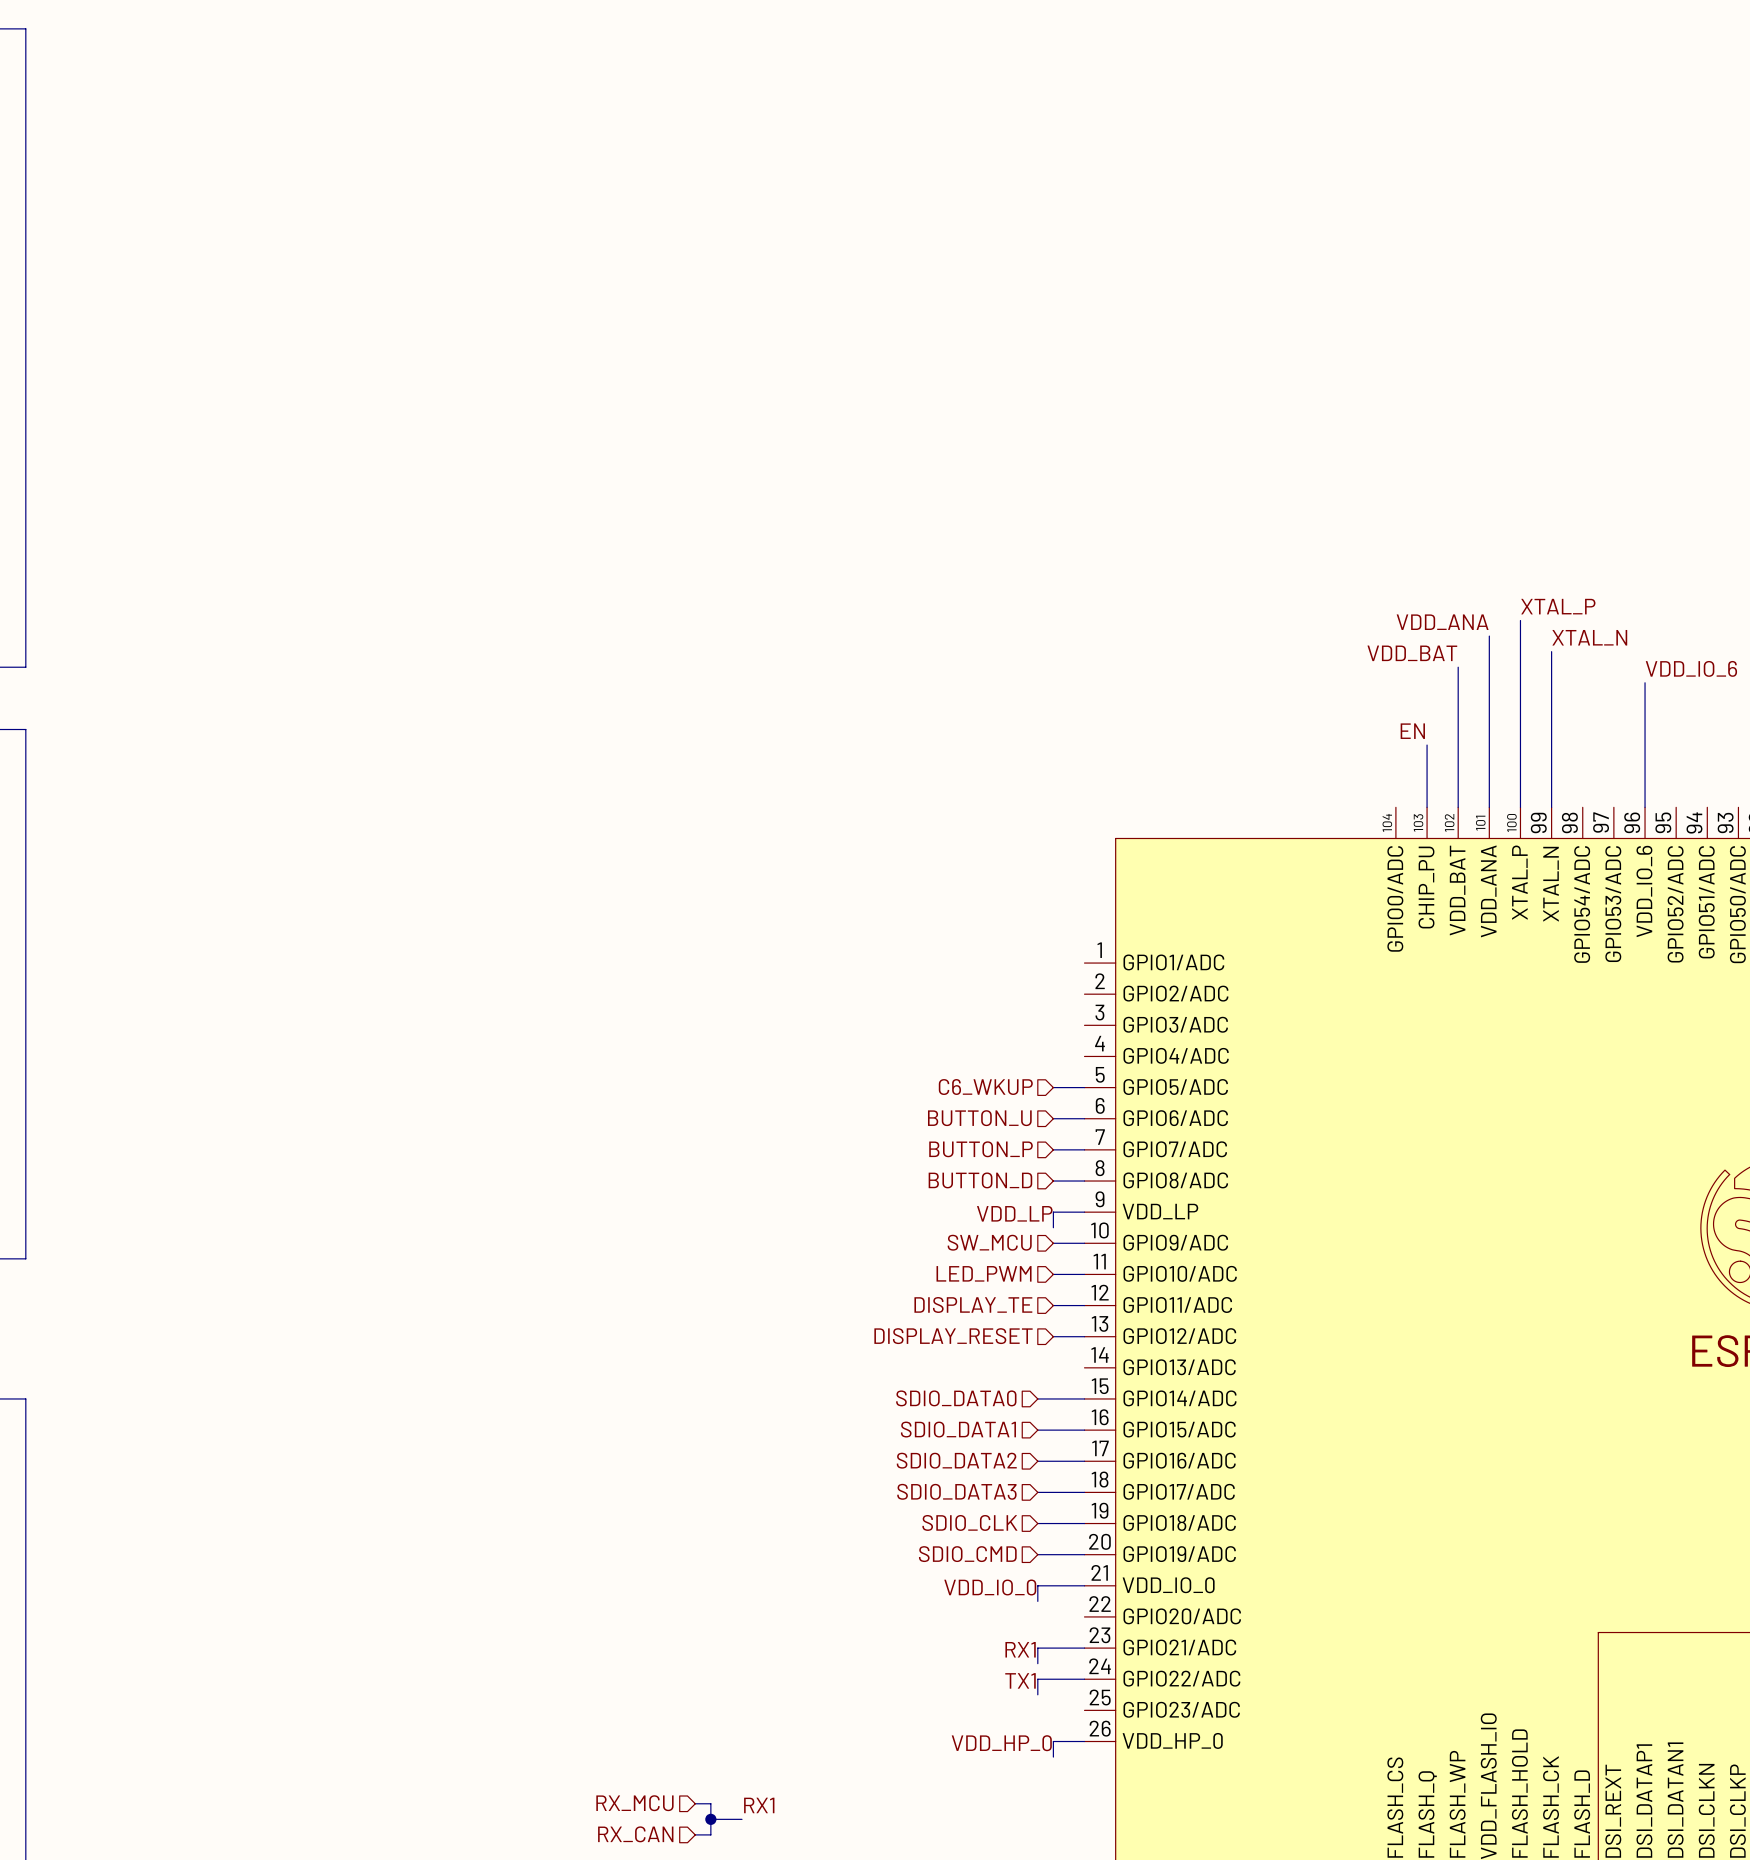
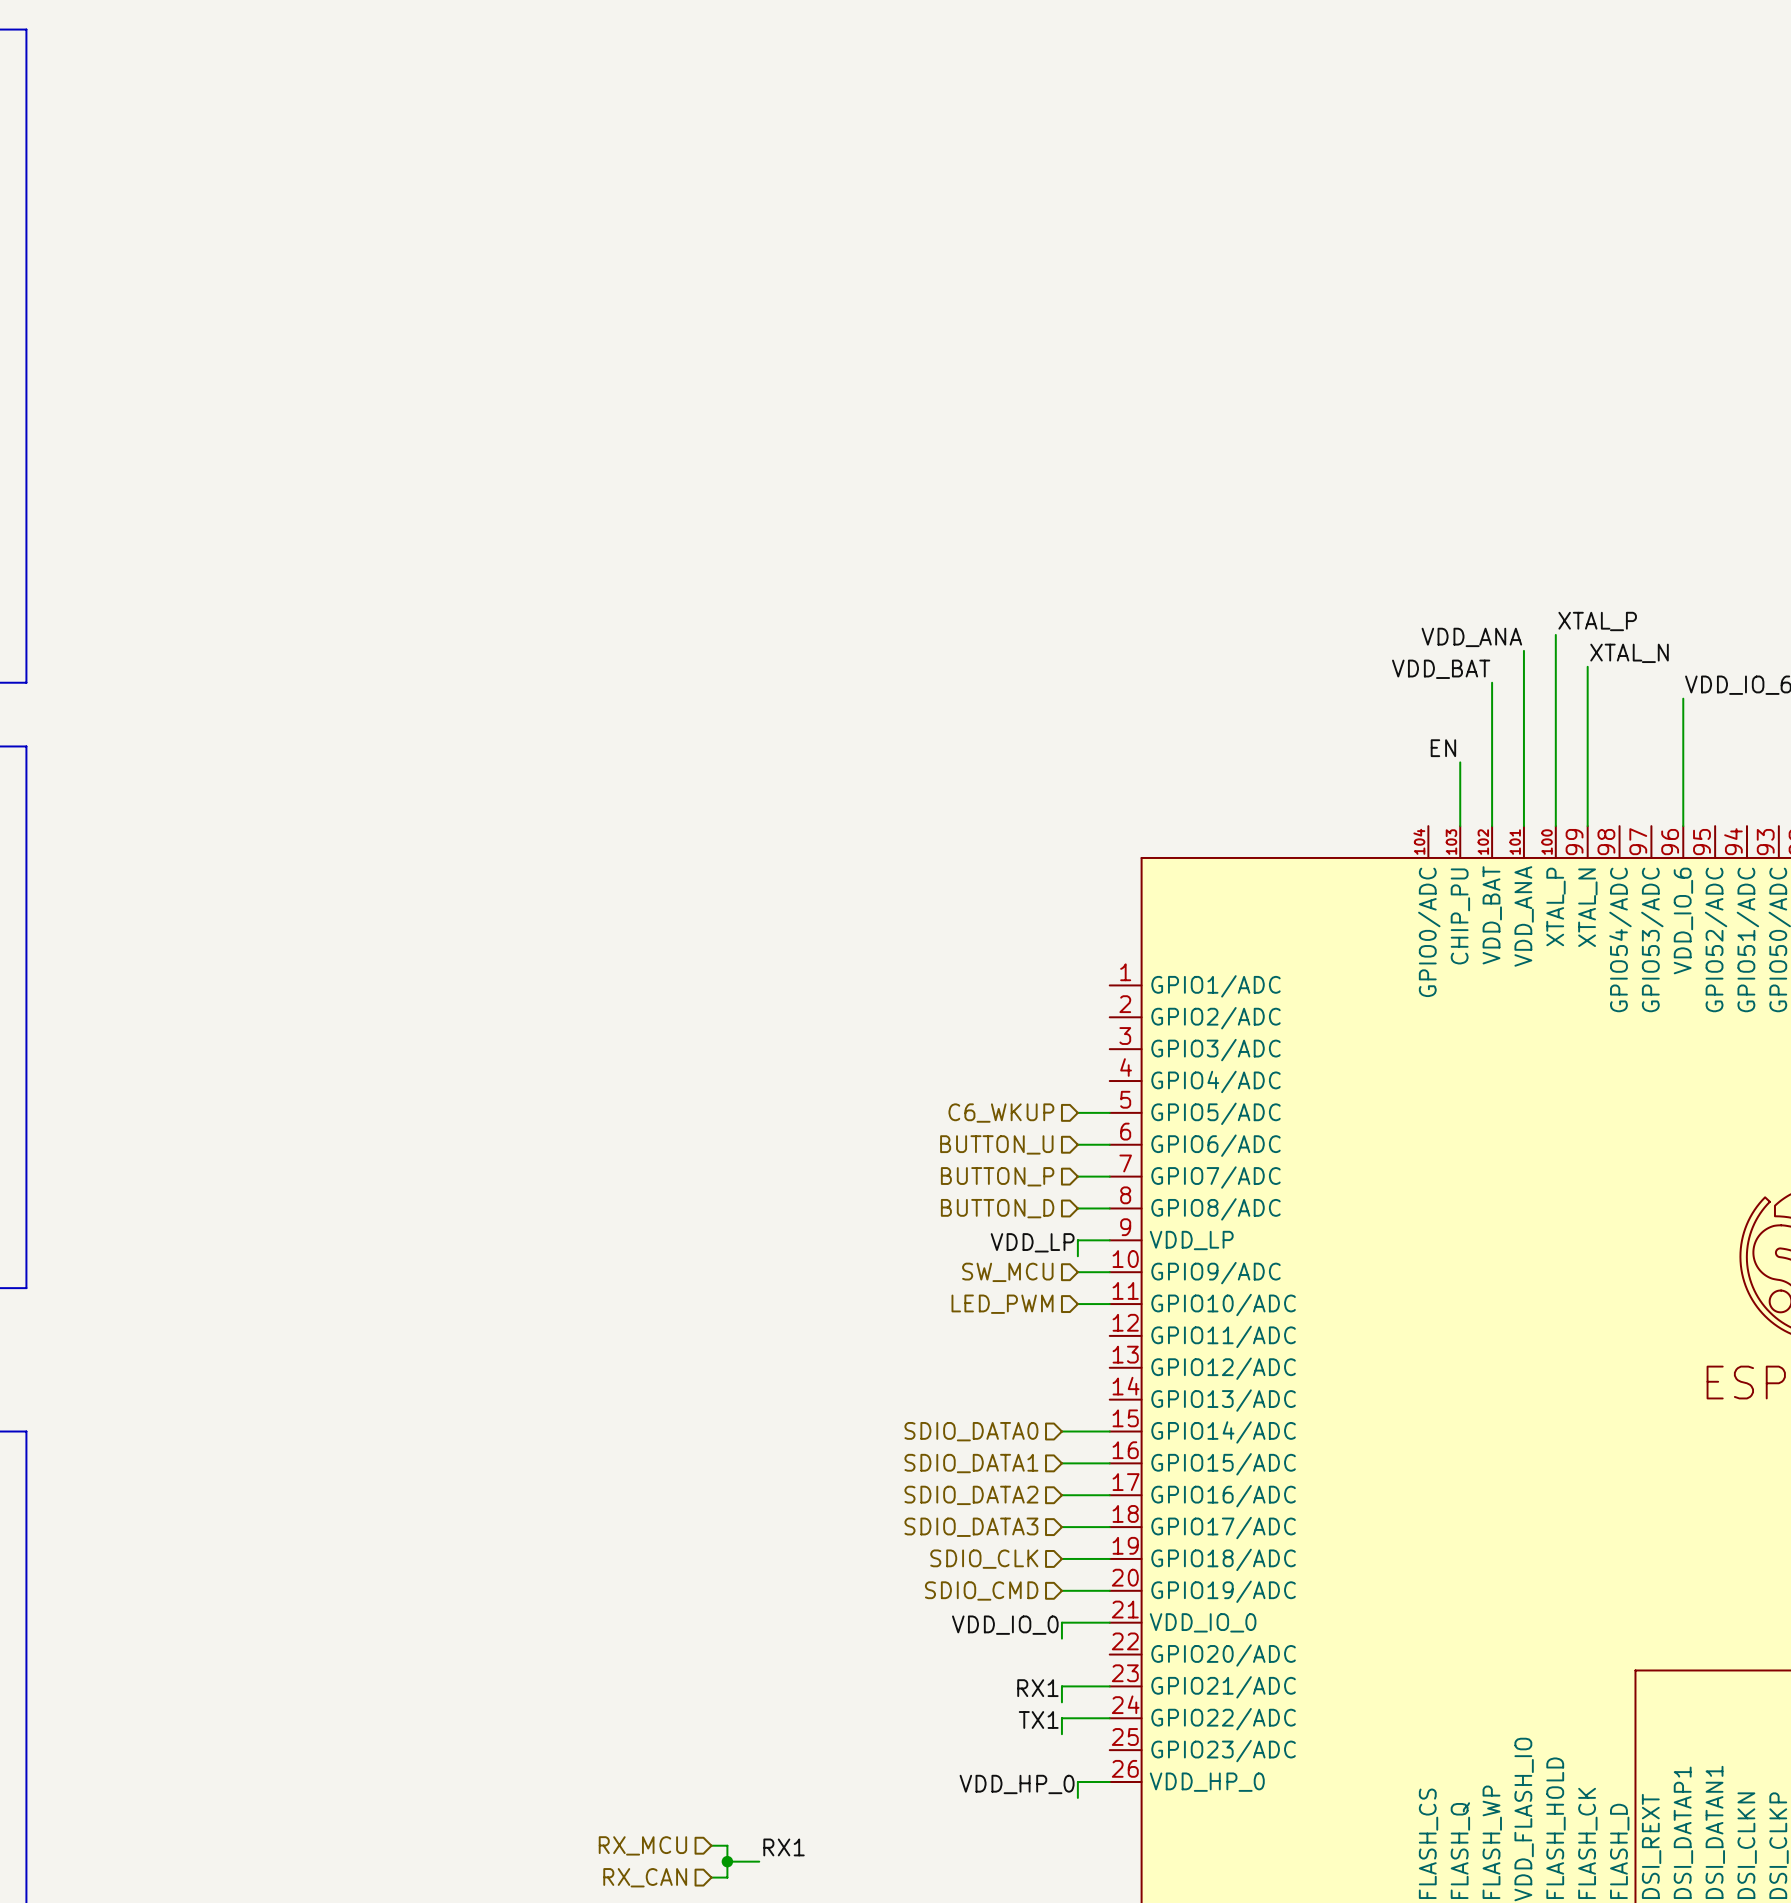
hierarchical label: DISPLAY_TE (973, 1304) -> none
wire: (1053, 1305) (1084, 1305) -> none
hierarchical label: DISPLAY_RESET (953, 1336) -> none
wire: (1053, 1336) (1084, 1336) -> none

